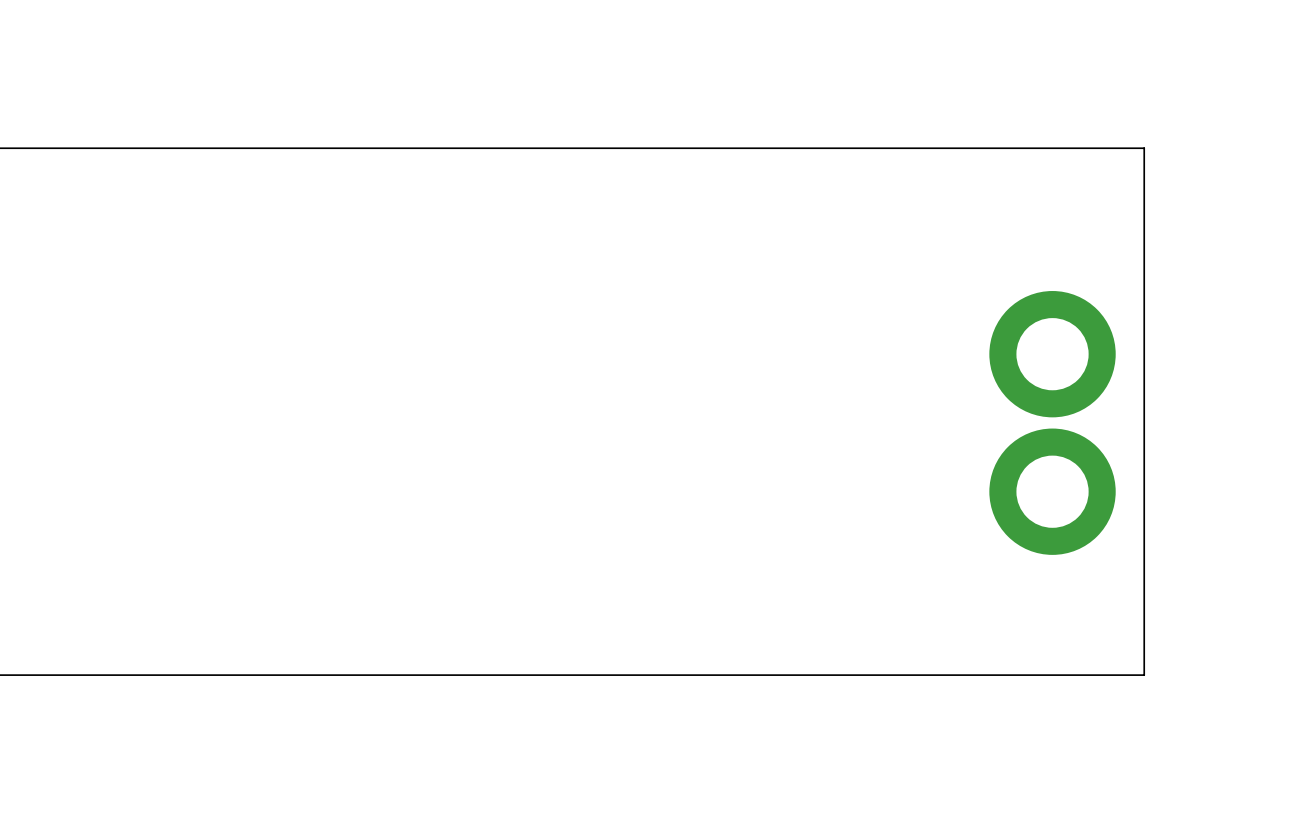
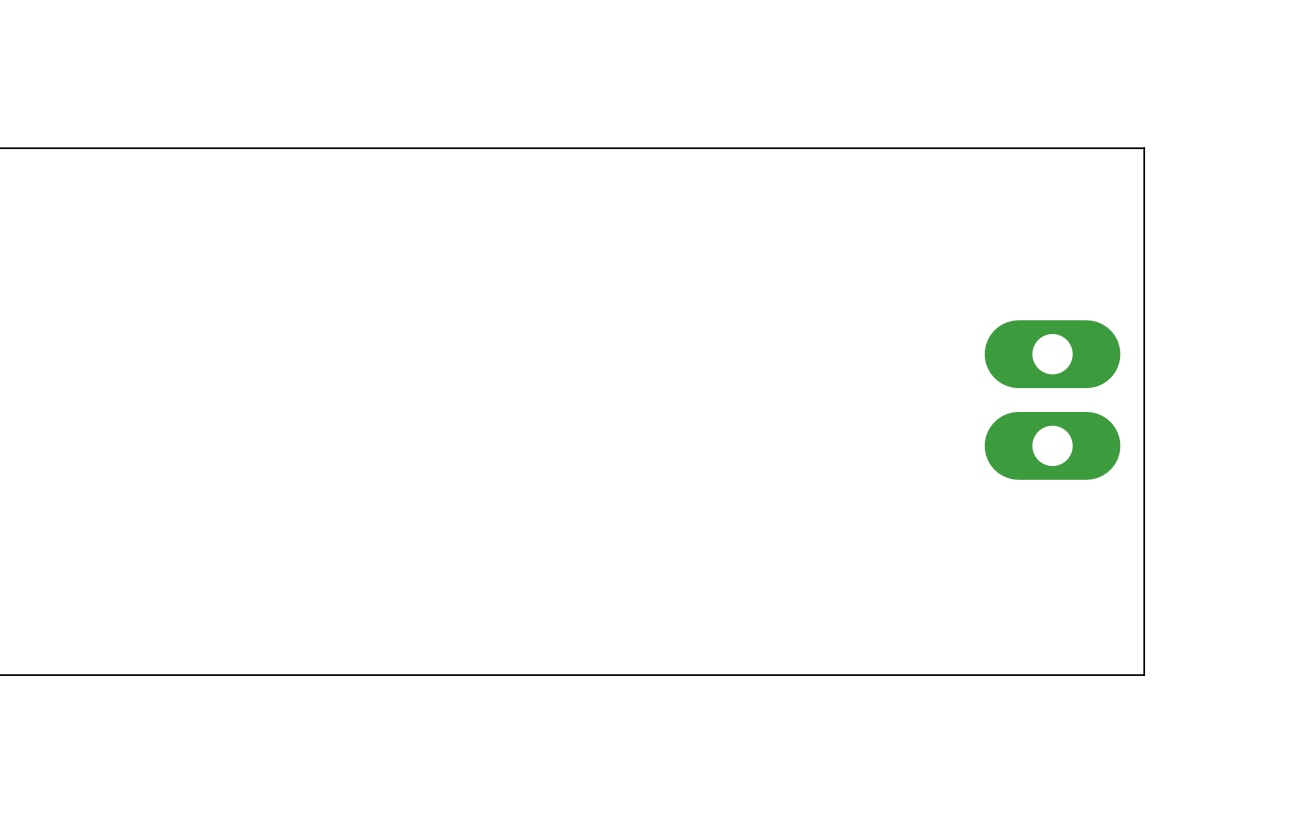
part footprint: [989, 291, 1116, 555] -> [984, 320, 1121, 480]

